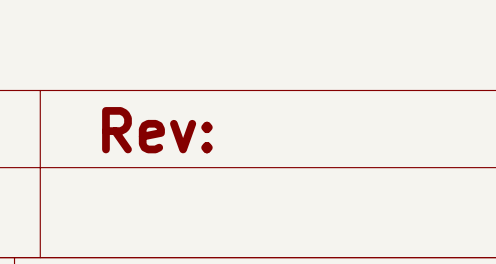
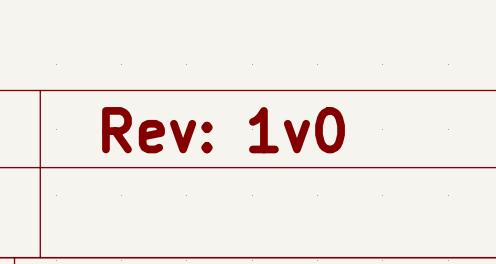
title block: Rev: (157, 130) -> Rev: 1v0 (223, 130)

